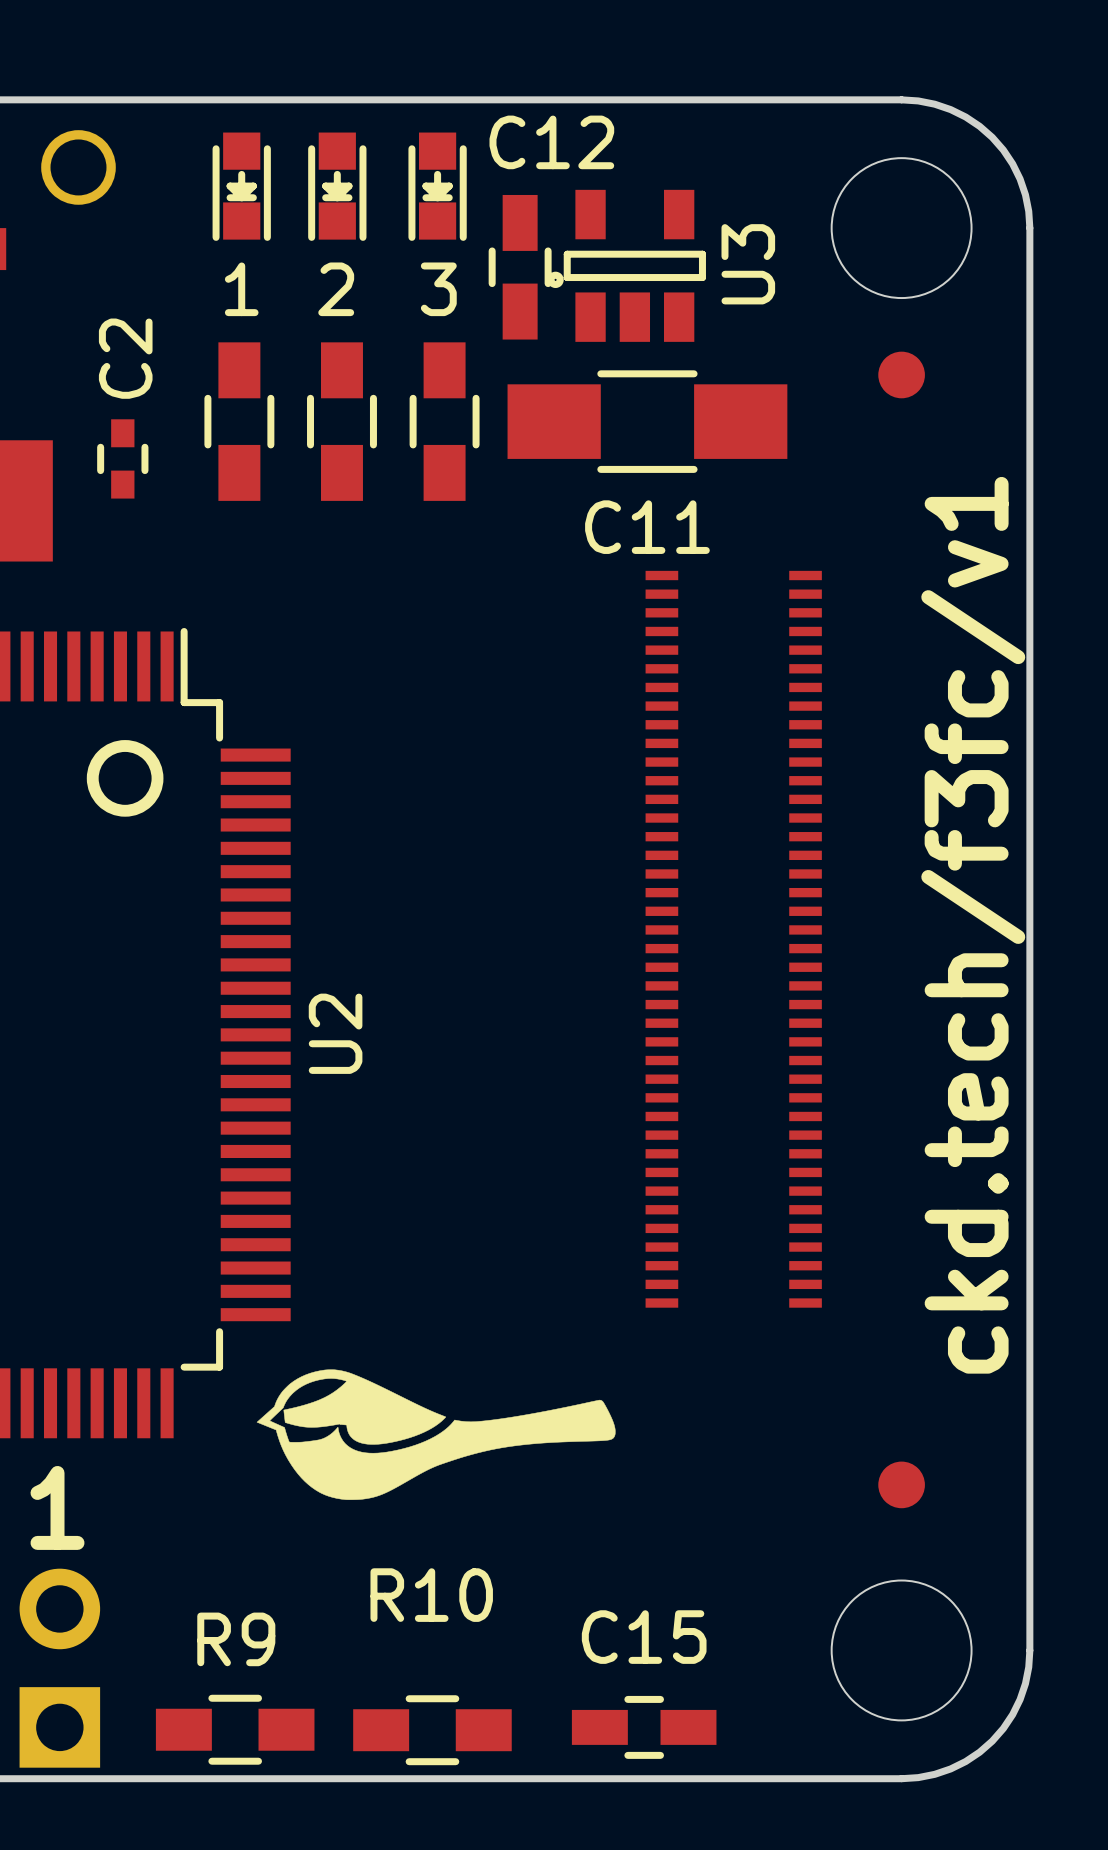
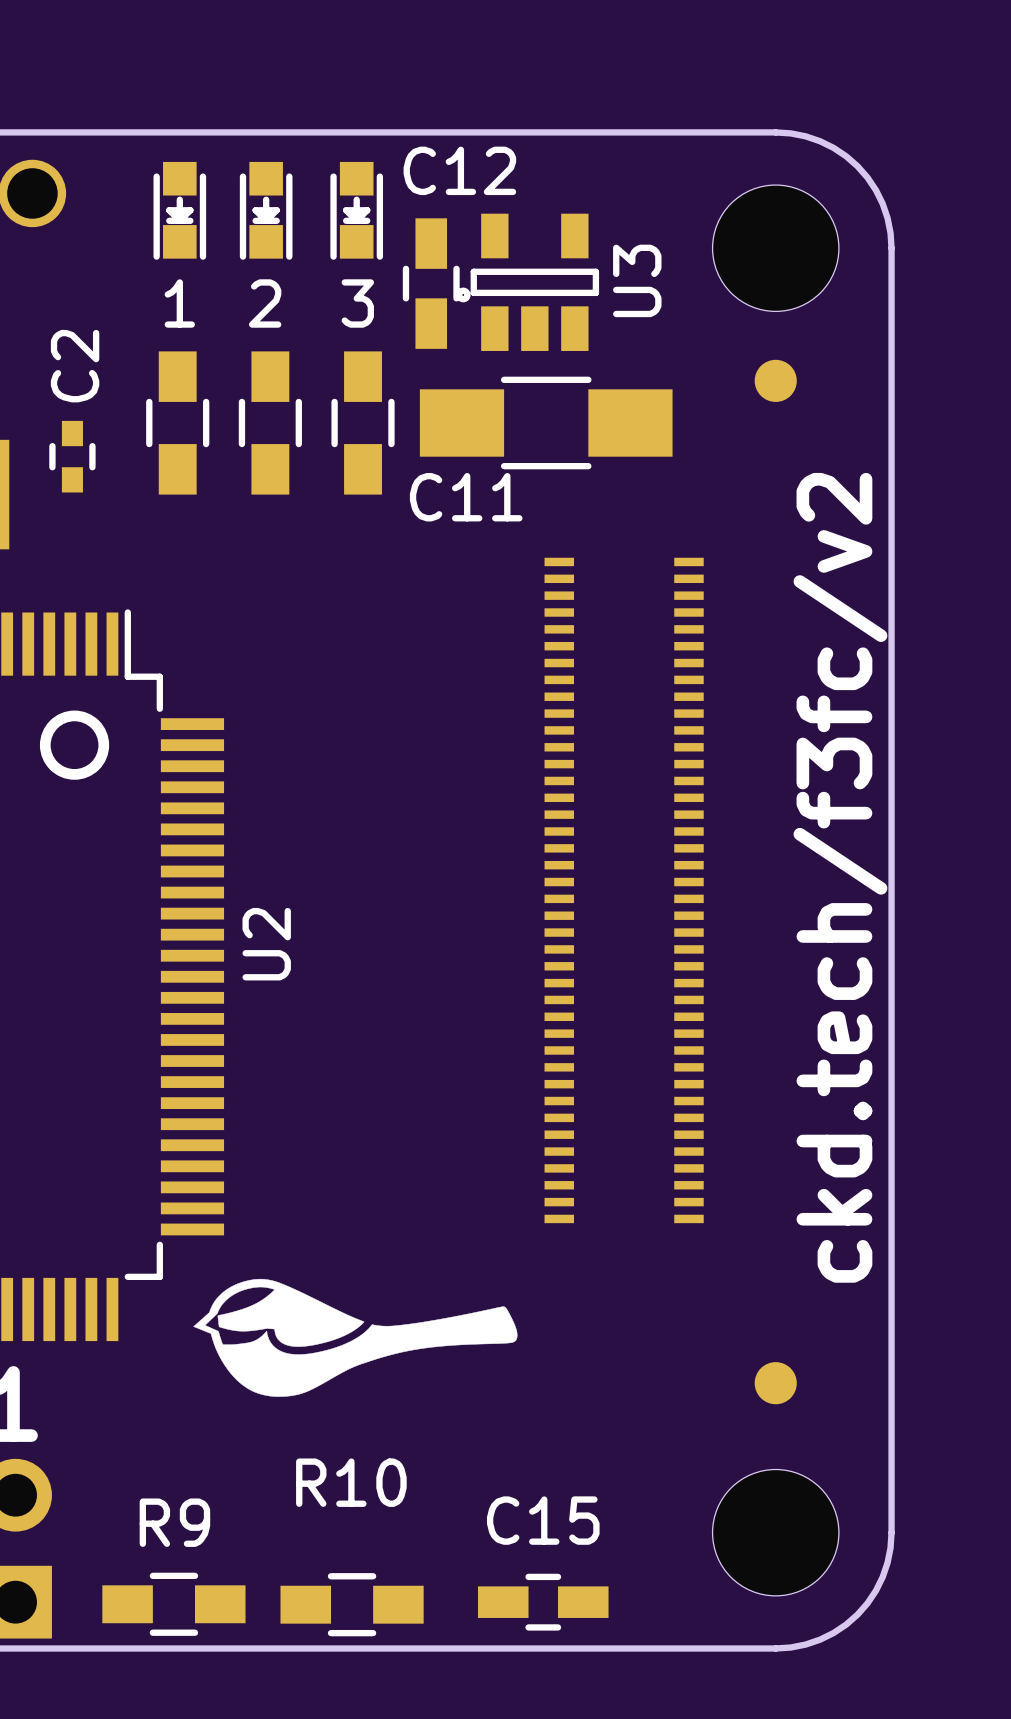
C11 name position: C11 (647, 527) -> C11 (466, 497)
text: ckd.tech/f3fc/v1 (973, 925) -> ckd.tech/f3fc/v2 (840, 877)
U2 name position: U2 (335, 1033) -> U2 (266, 944)

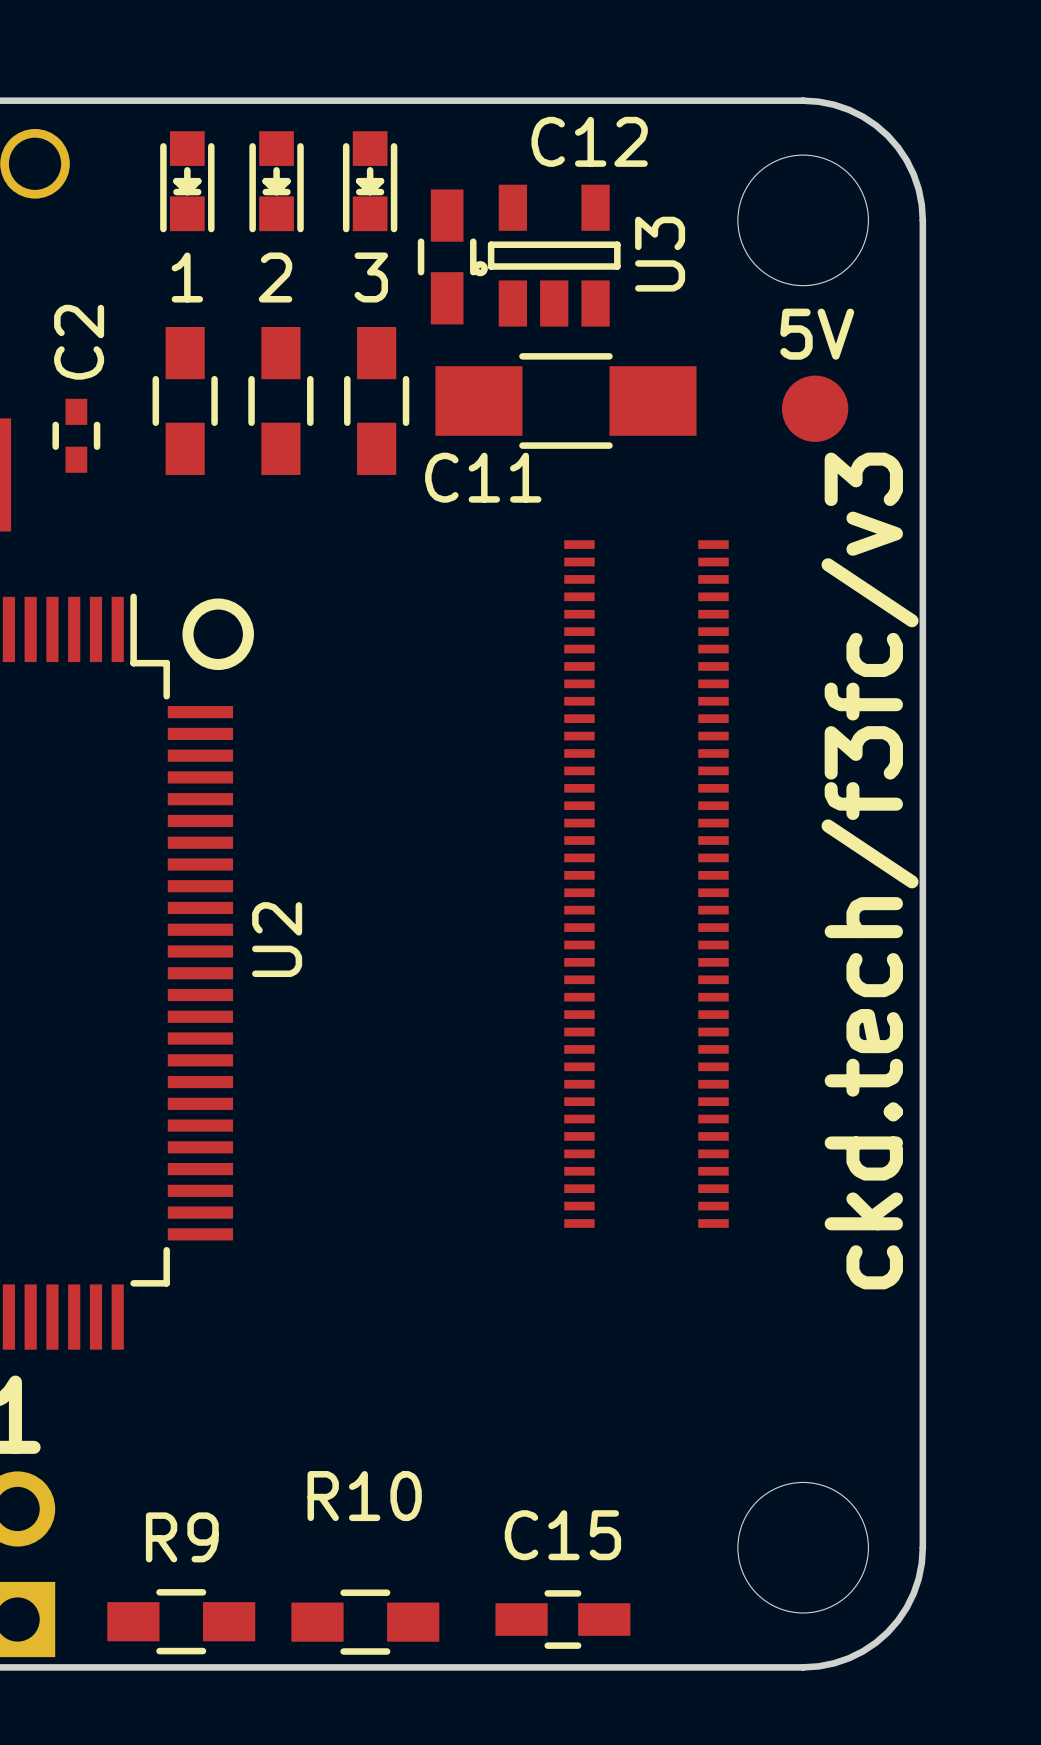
C12 name position: C12 (459, 170) -> C12 (589, 141)
text: none -> 5V (817, 334)
part: (775, 380) -> none
part: none -> (815, 408)
drawing position: (74, 745) -> (218, 634)
text: ckd.tech/f3fc/v2 (840, 877) -> ckd.tech/f3fc/v3 (870, 870)
drawing: [193, 1278, 518, 1397] -> none
part: (775, 1383) -> none

